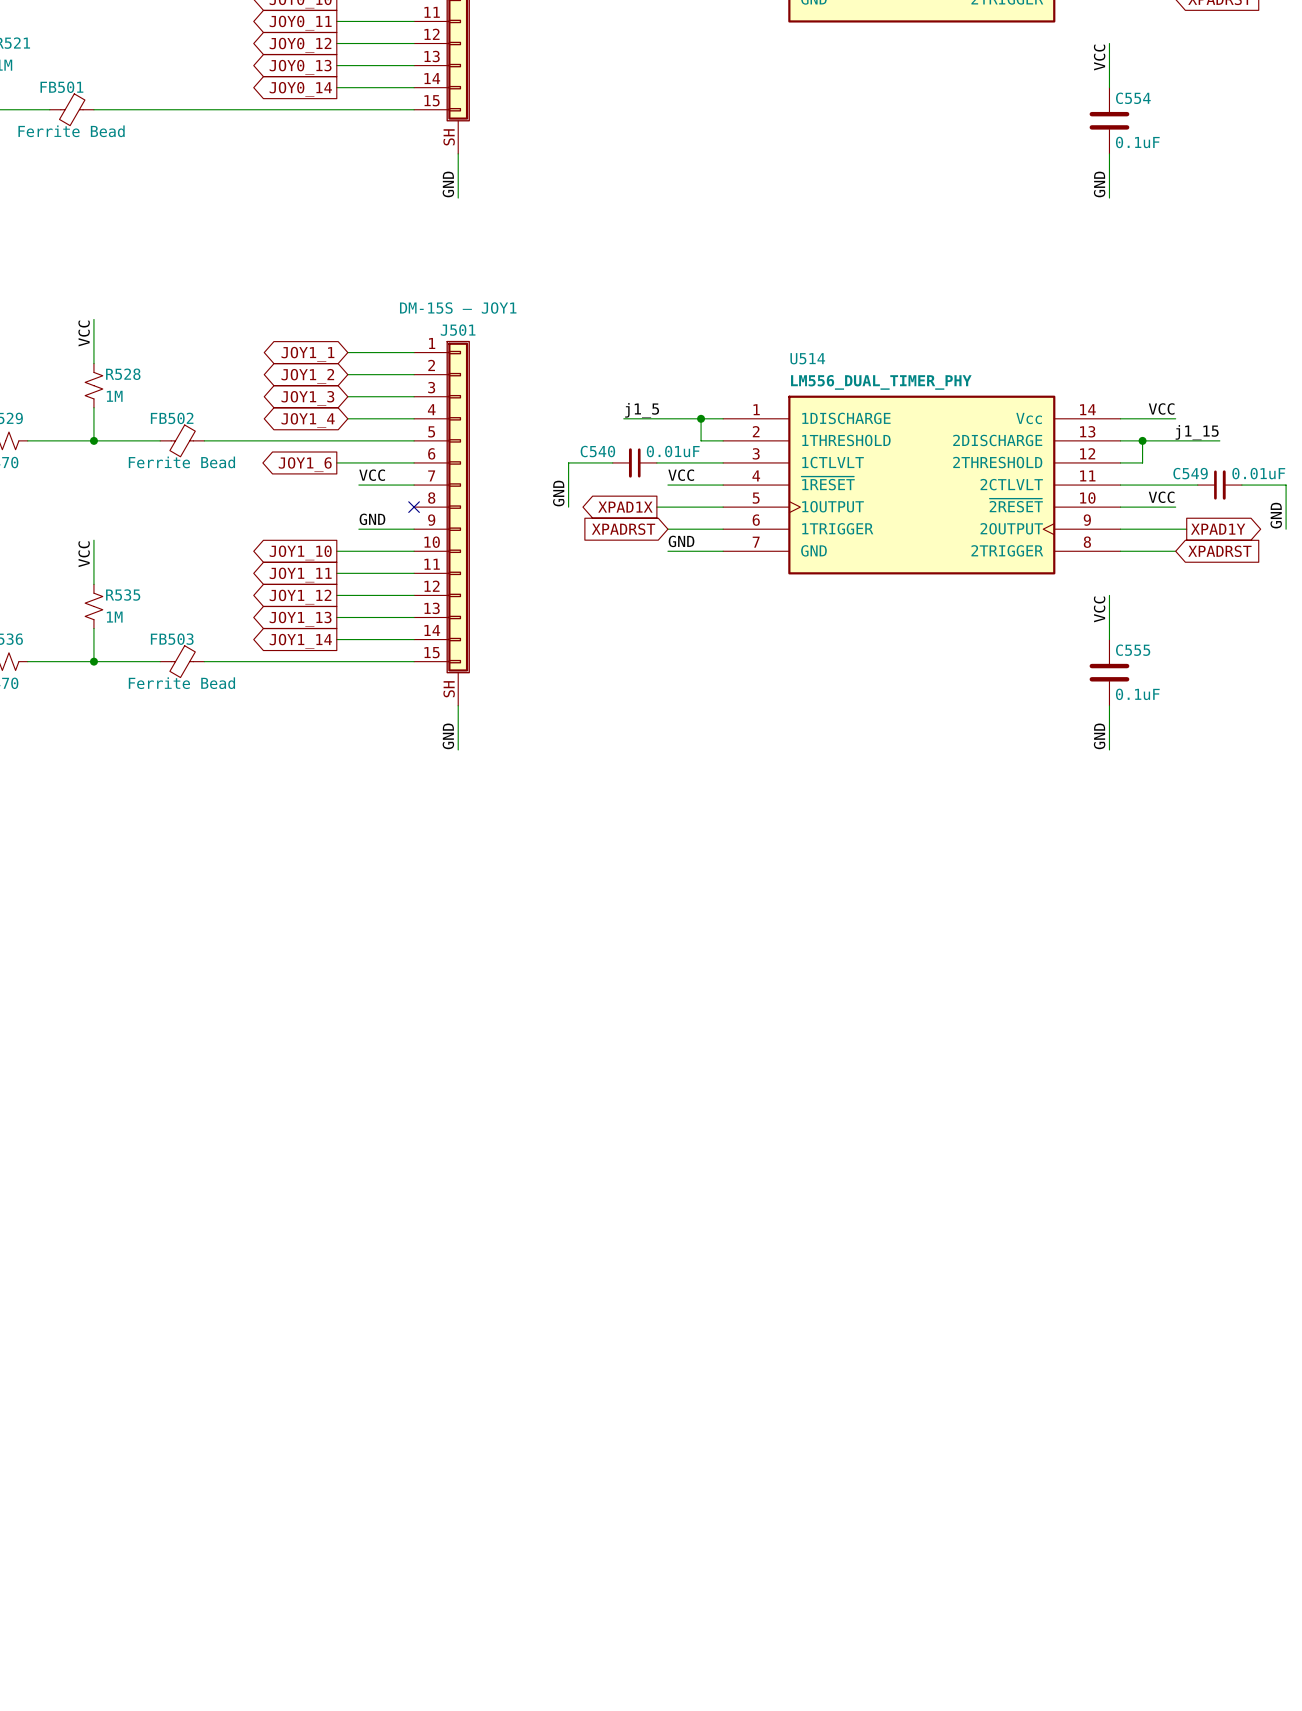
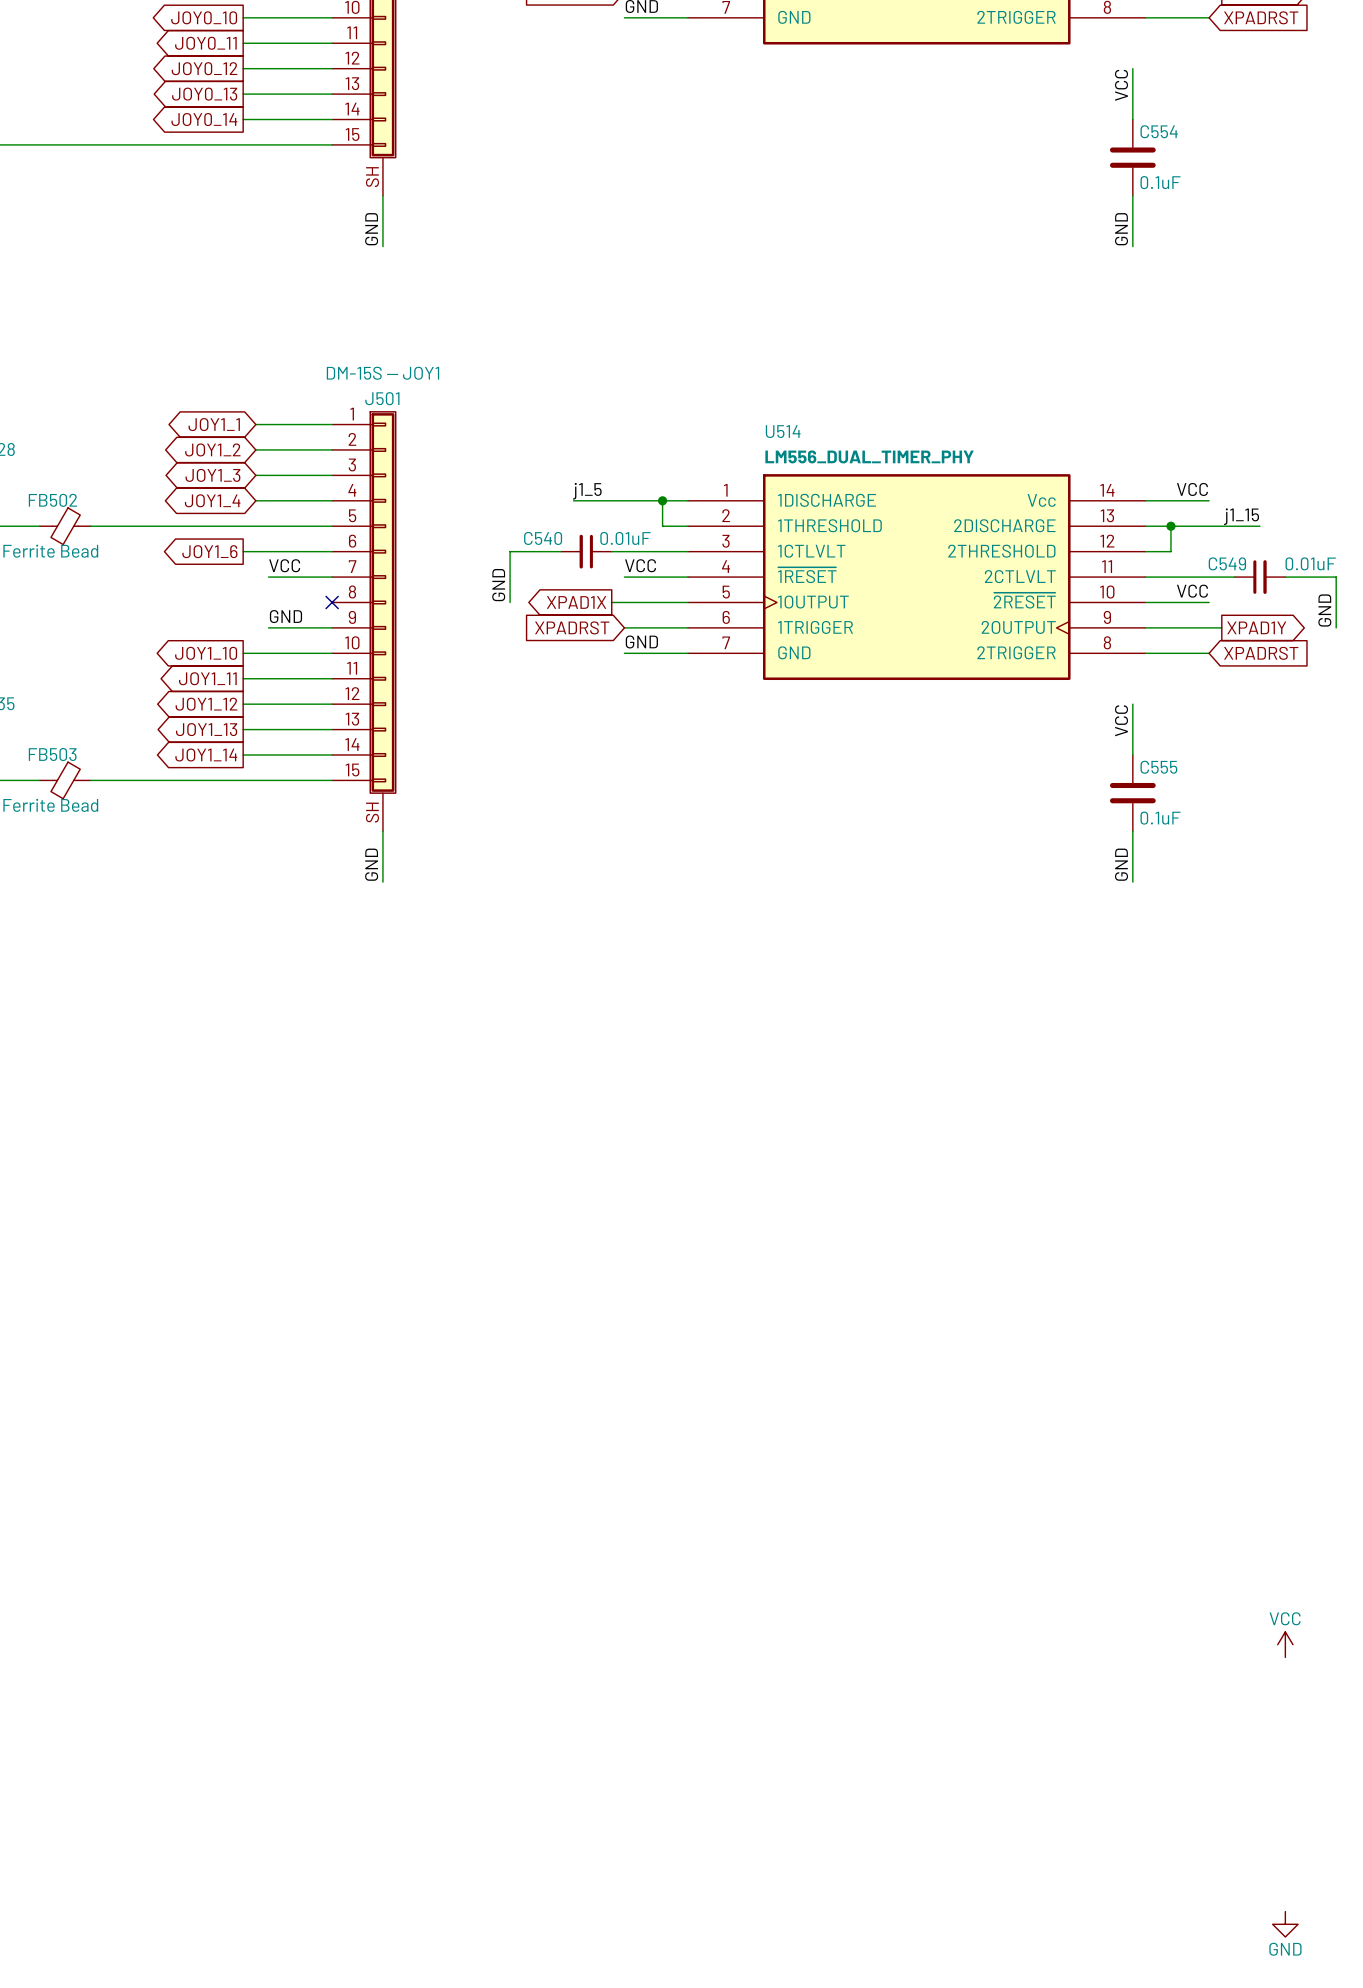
power symbol: none -> VCC (1285, 1644)
power symbol: none -> GND (1285, 1924)

